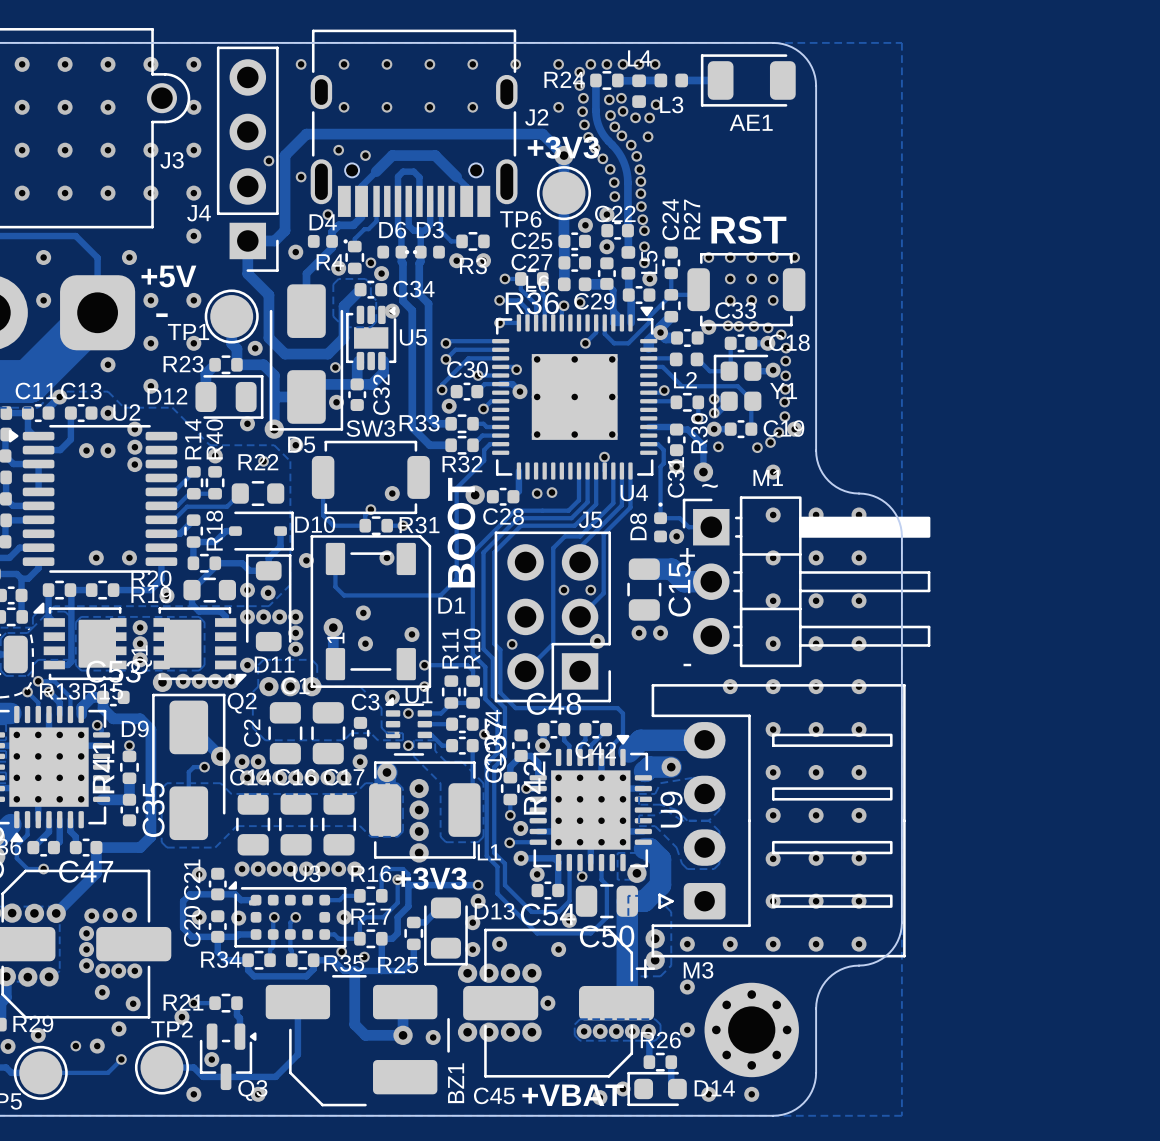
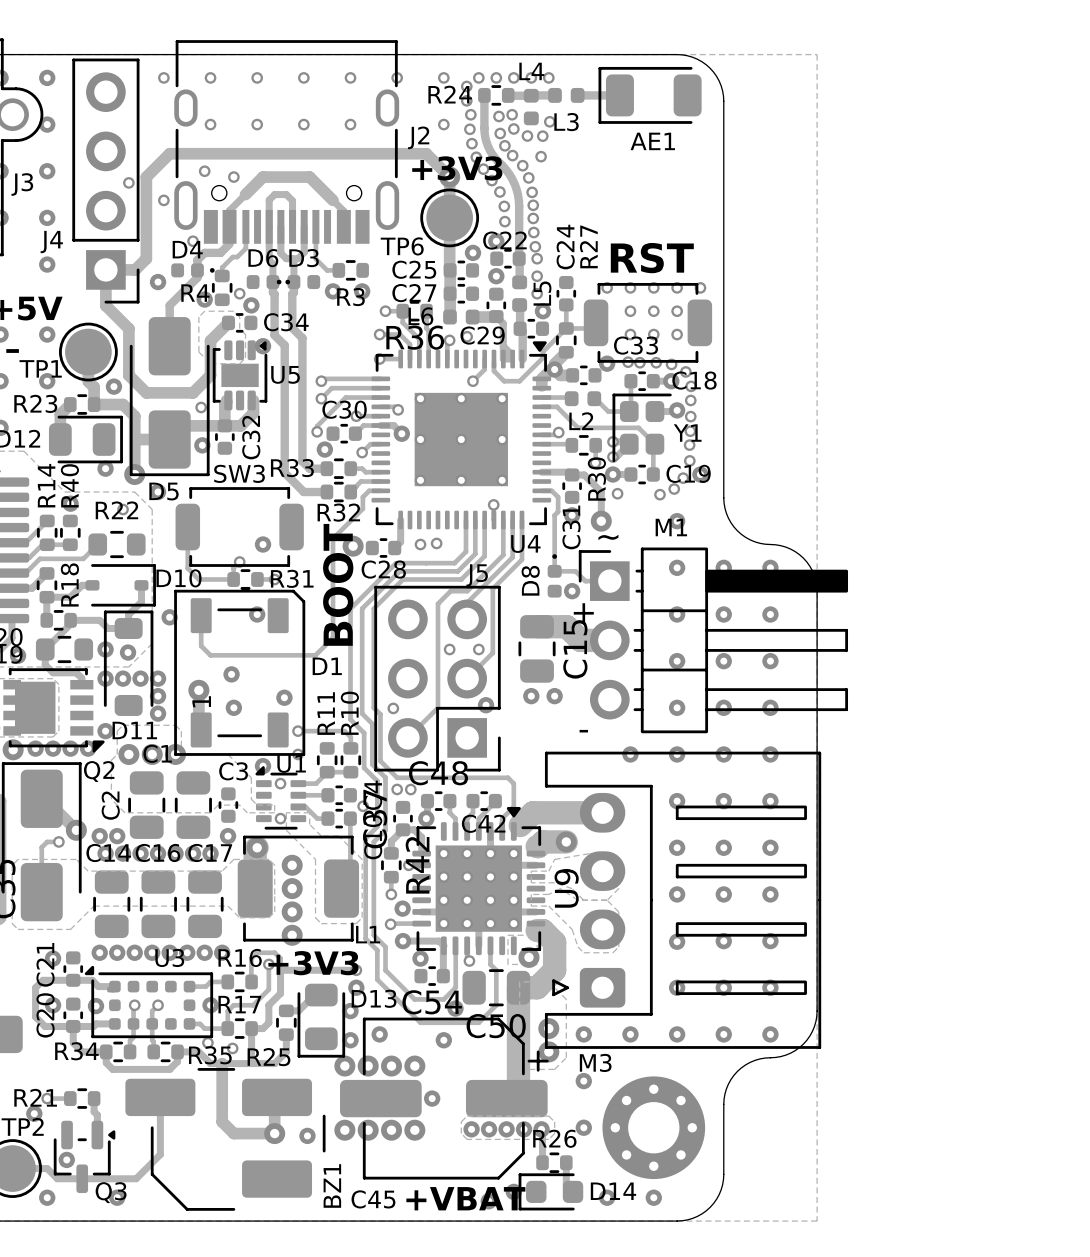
via: none -> (397, 789)
via: none -> (410, 789)

